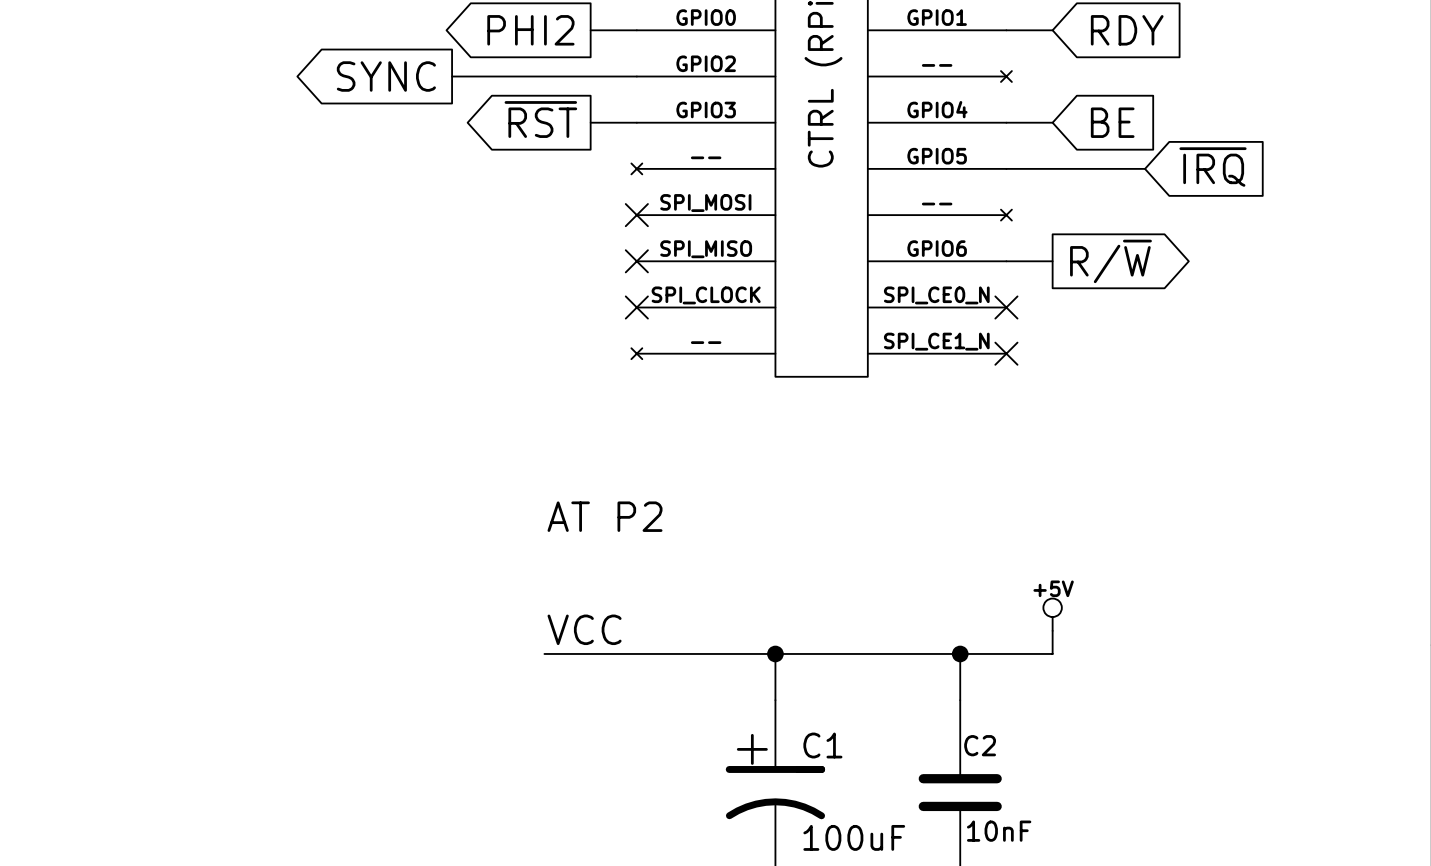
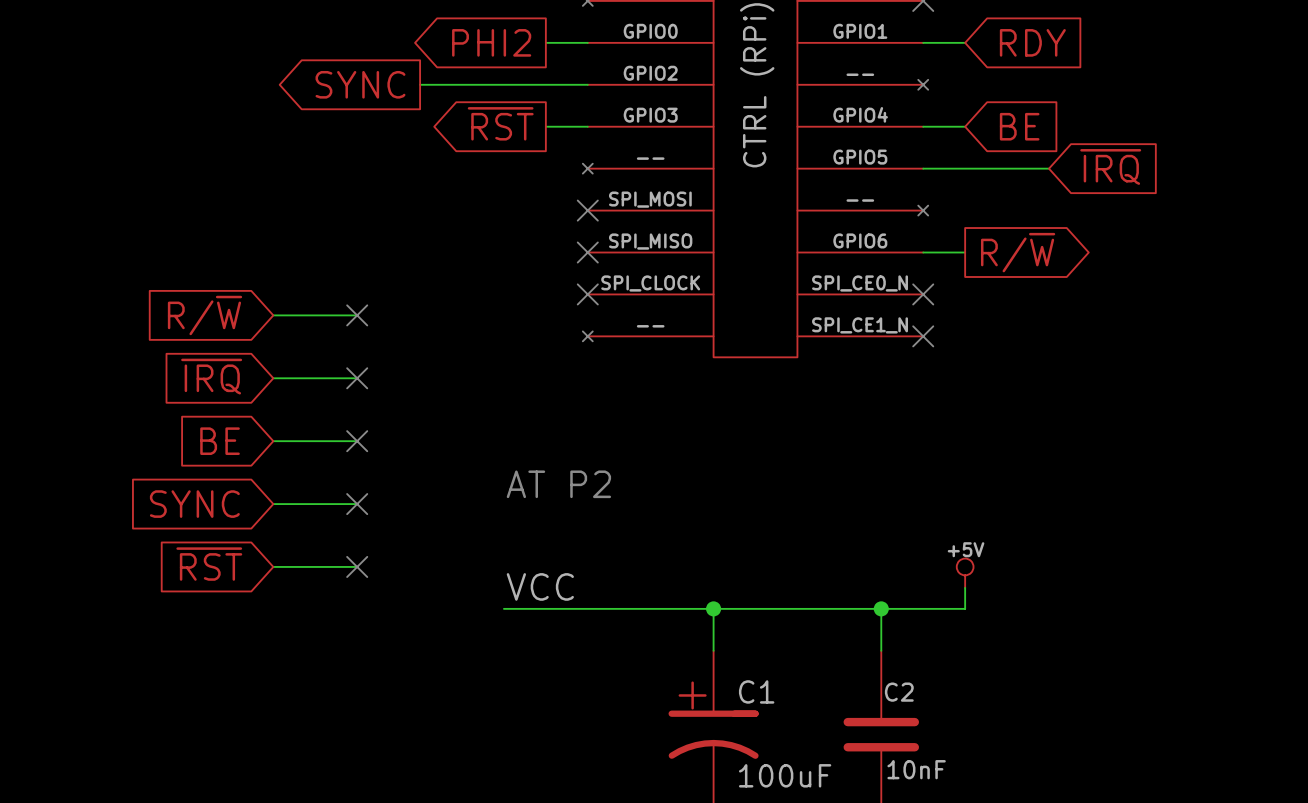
global label: none -> R/~{W} (204, 315)
wire: none -> (273, 315) (357, 315)
no-connect mark: none -> (357, 315)
global label: none -> ~{IRQ} (211, 376)
wire: none -> (273, 378) (357, 378)
no-connect mark: none -> (357, 378)
global label: none -> BE (220, 441)
wire: none -> (273, 441) (357, 441)
no-connect mark: none -> (357, 441)
global label: none -> SYNC (194, 504)
wire: none -> (273, 504) (357, 504)
no-connect mark: none -> (357, 504)
global label: none -> ~{RST} (209, 564)
wire: none -> (273, 566) (357, 566)
no-connect mark: none -> (357, 566)

